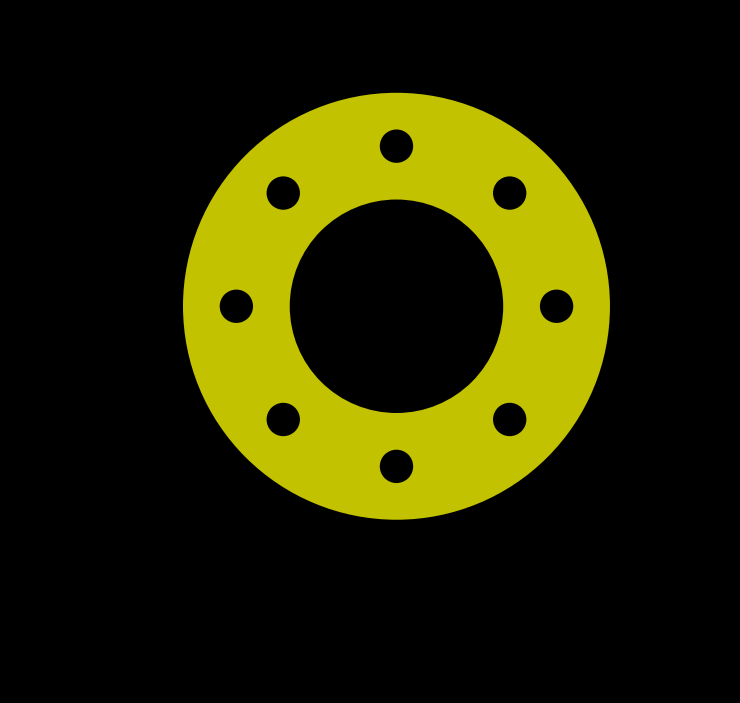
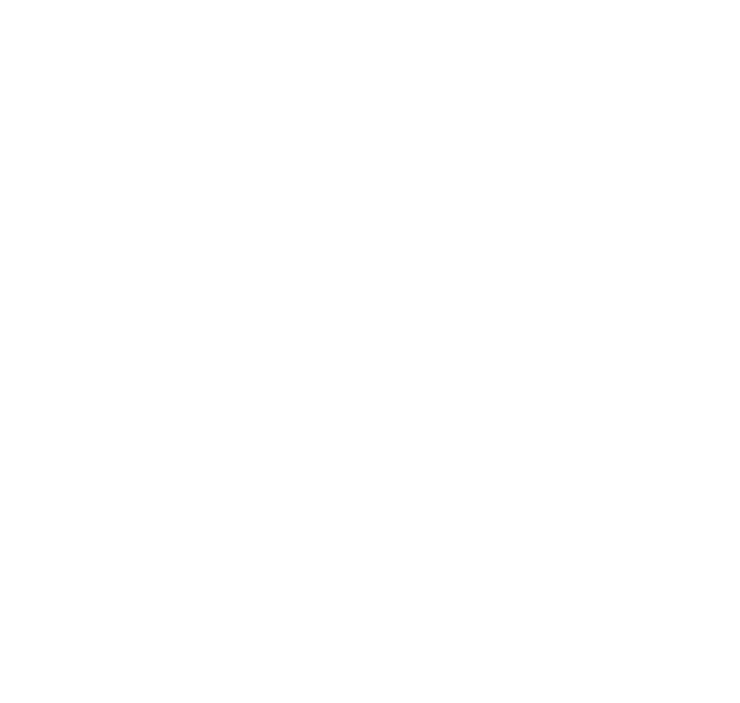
part: (396, 306) -> none

